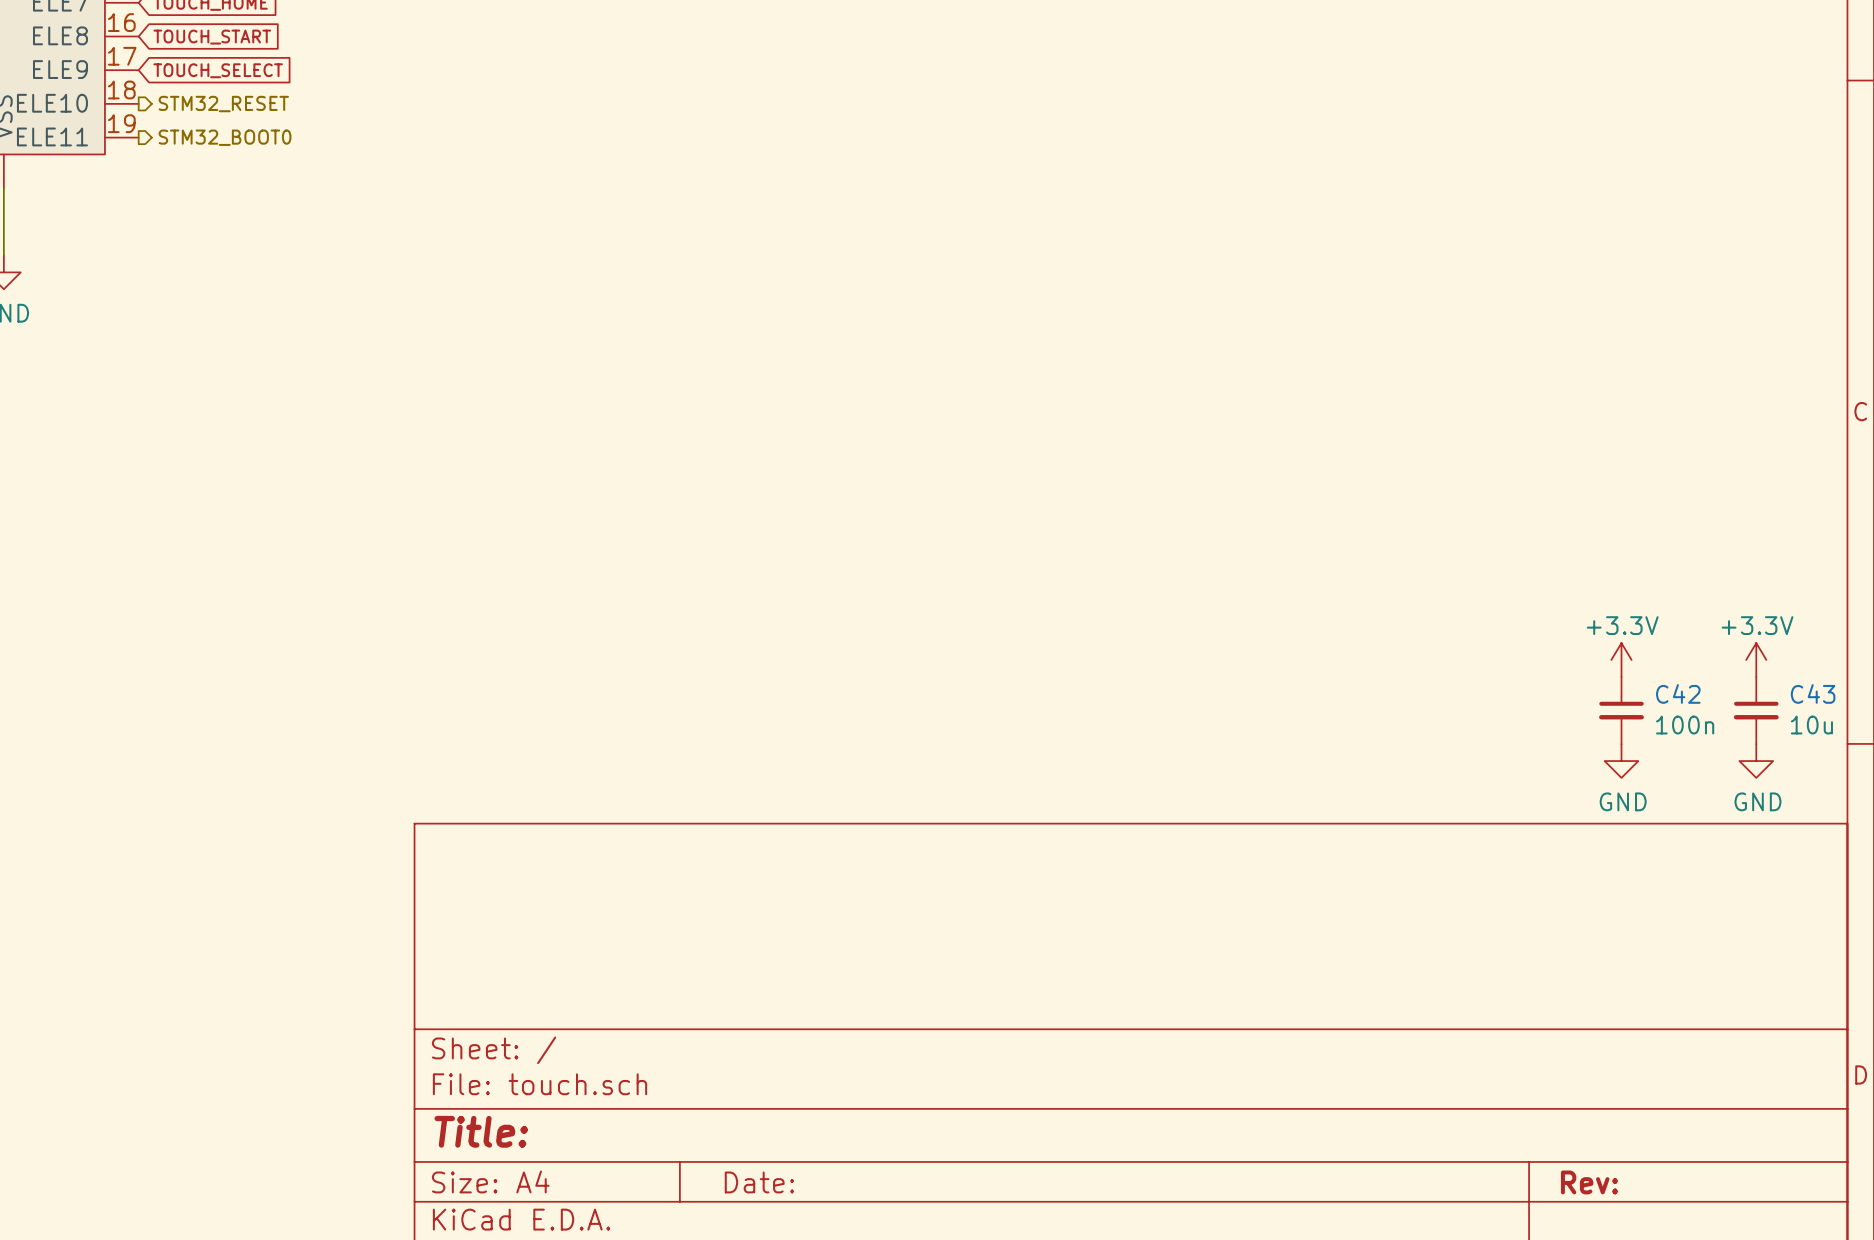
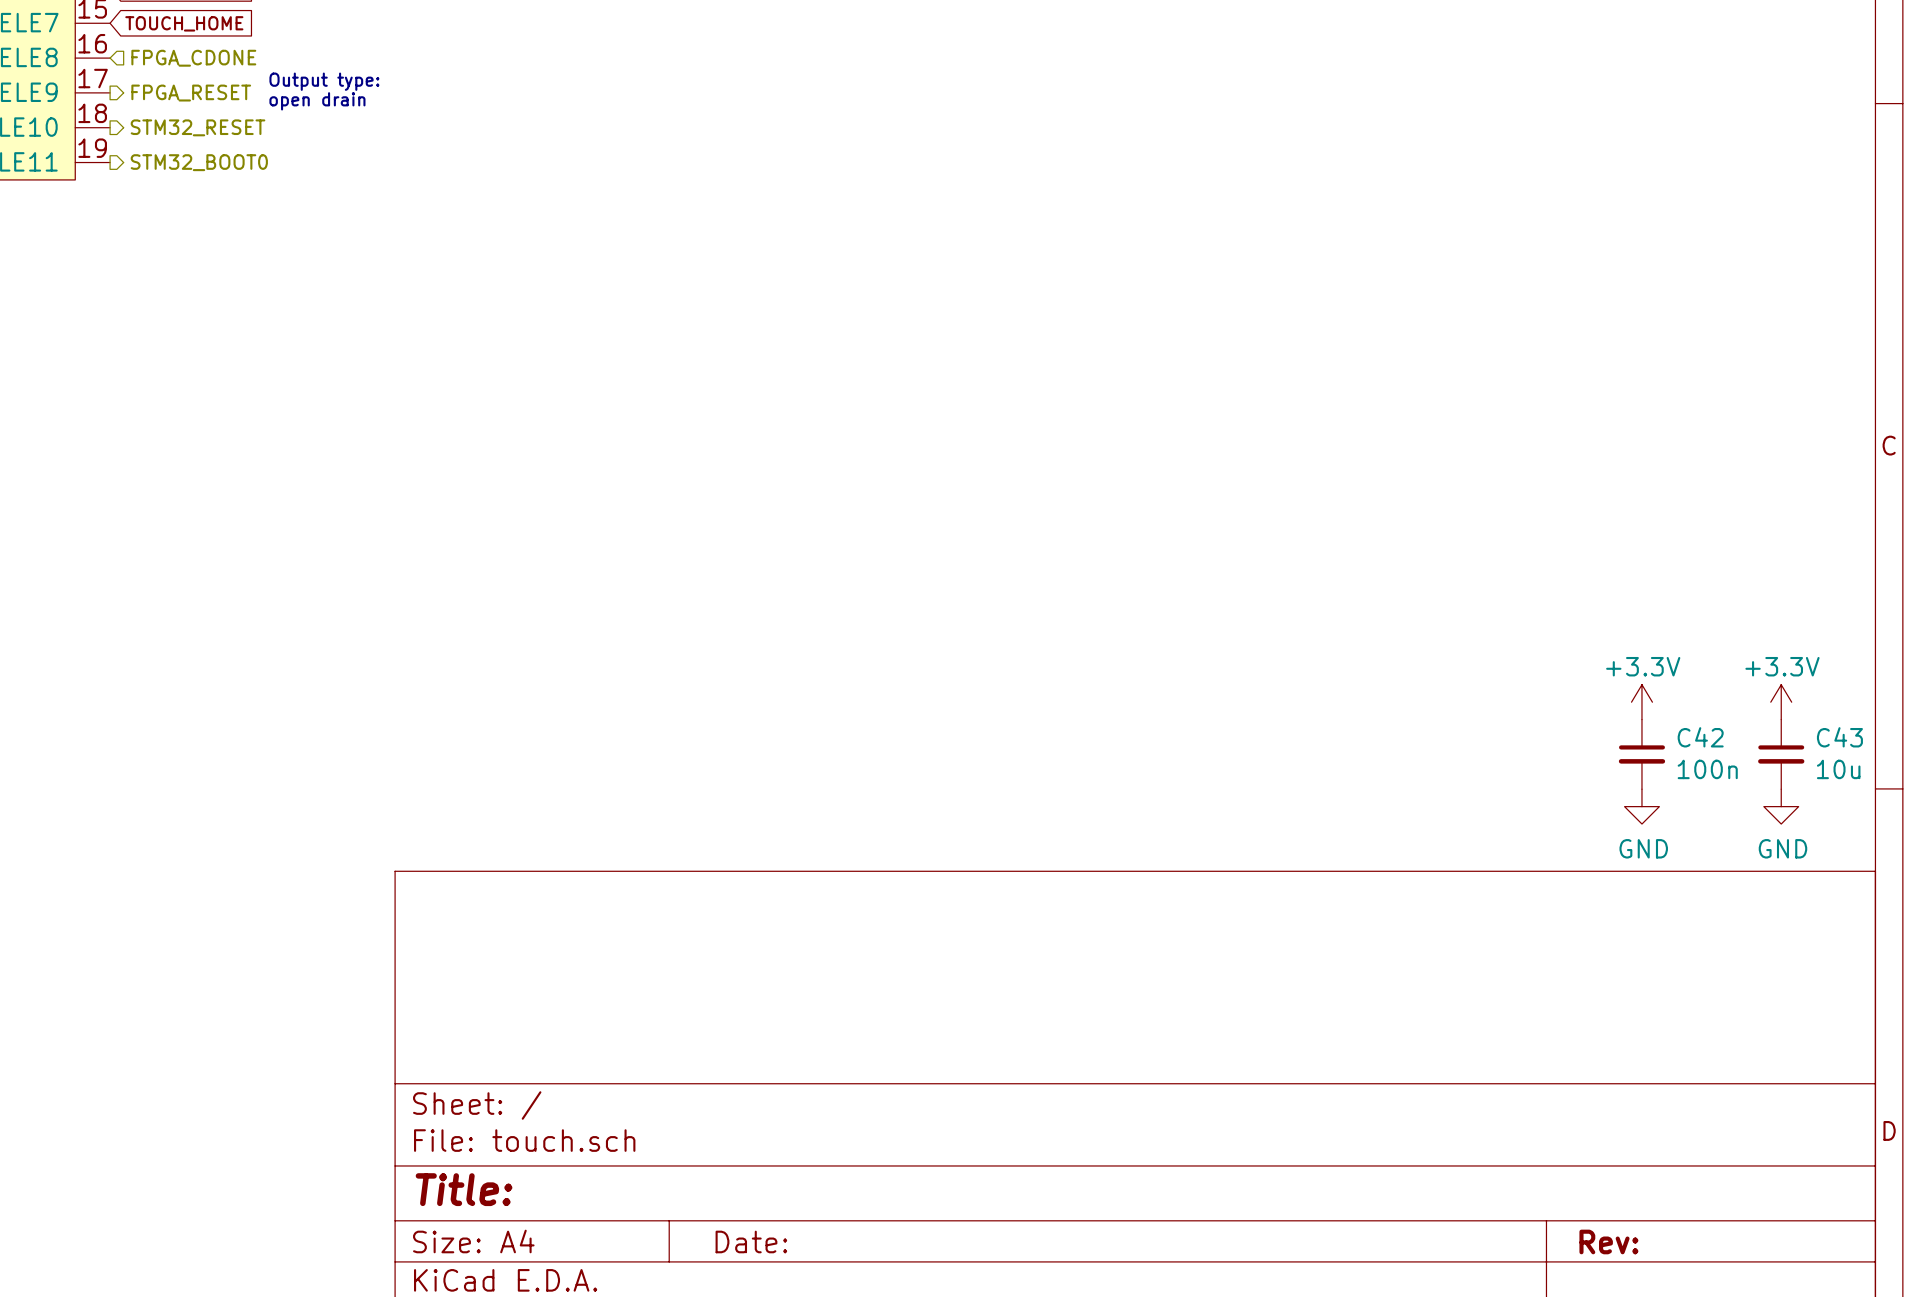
hierarchical label: none -> FPGA_CDONE (193, 58)
global label: TOUCH_START (212, 37) -> none
text: none -> Output type: (324, 81)
hierarchical label: none -> FPGA_RESET (191, 93)
global label: TOUCH_SELECT (218, 70) -> none
text: none -> open drain (317, 101)

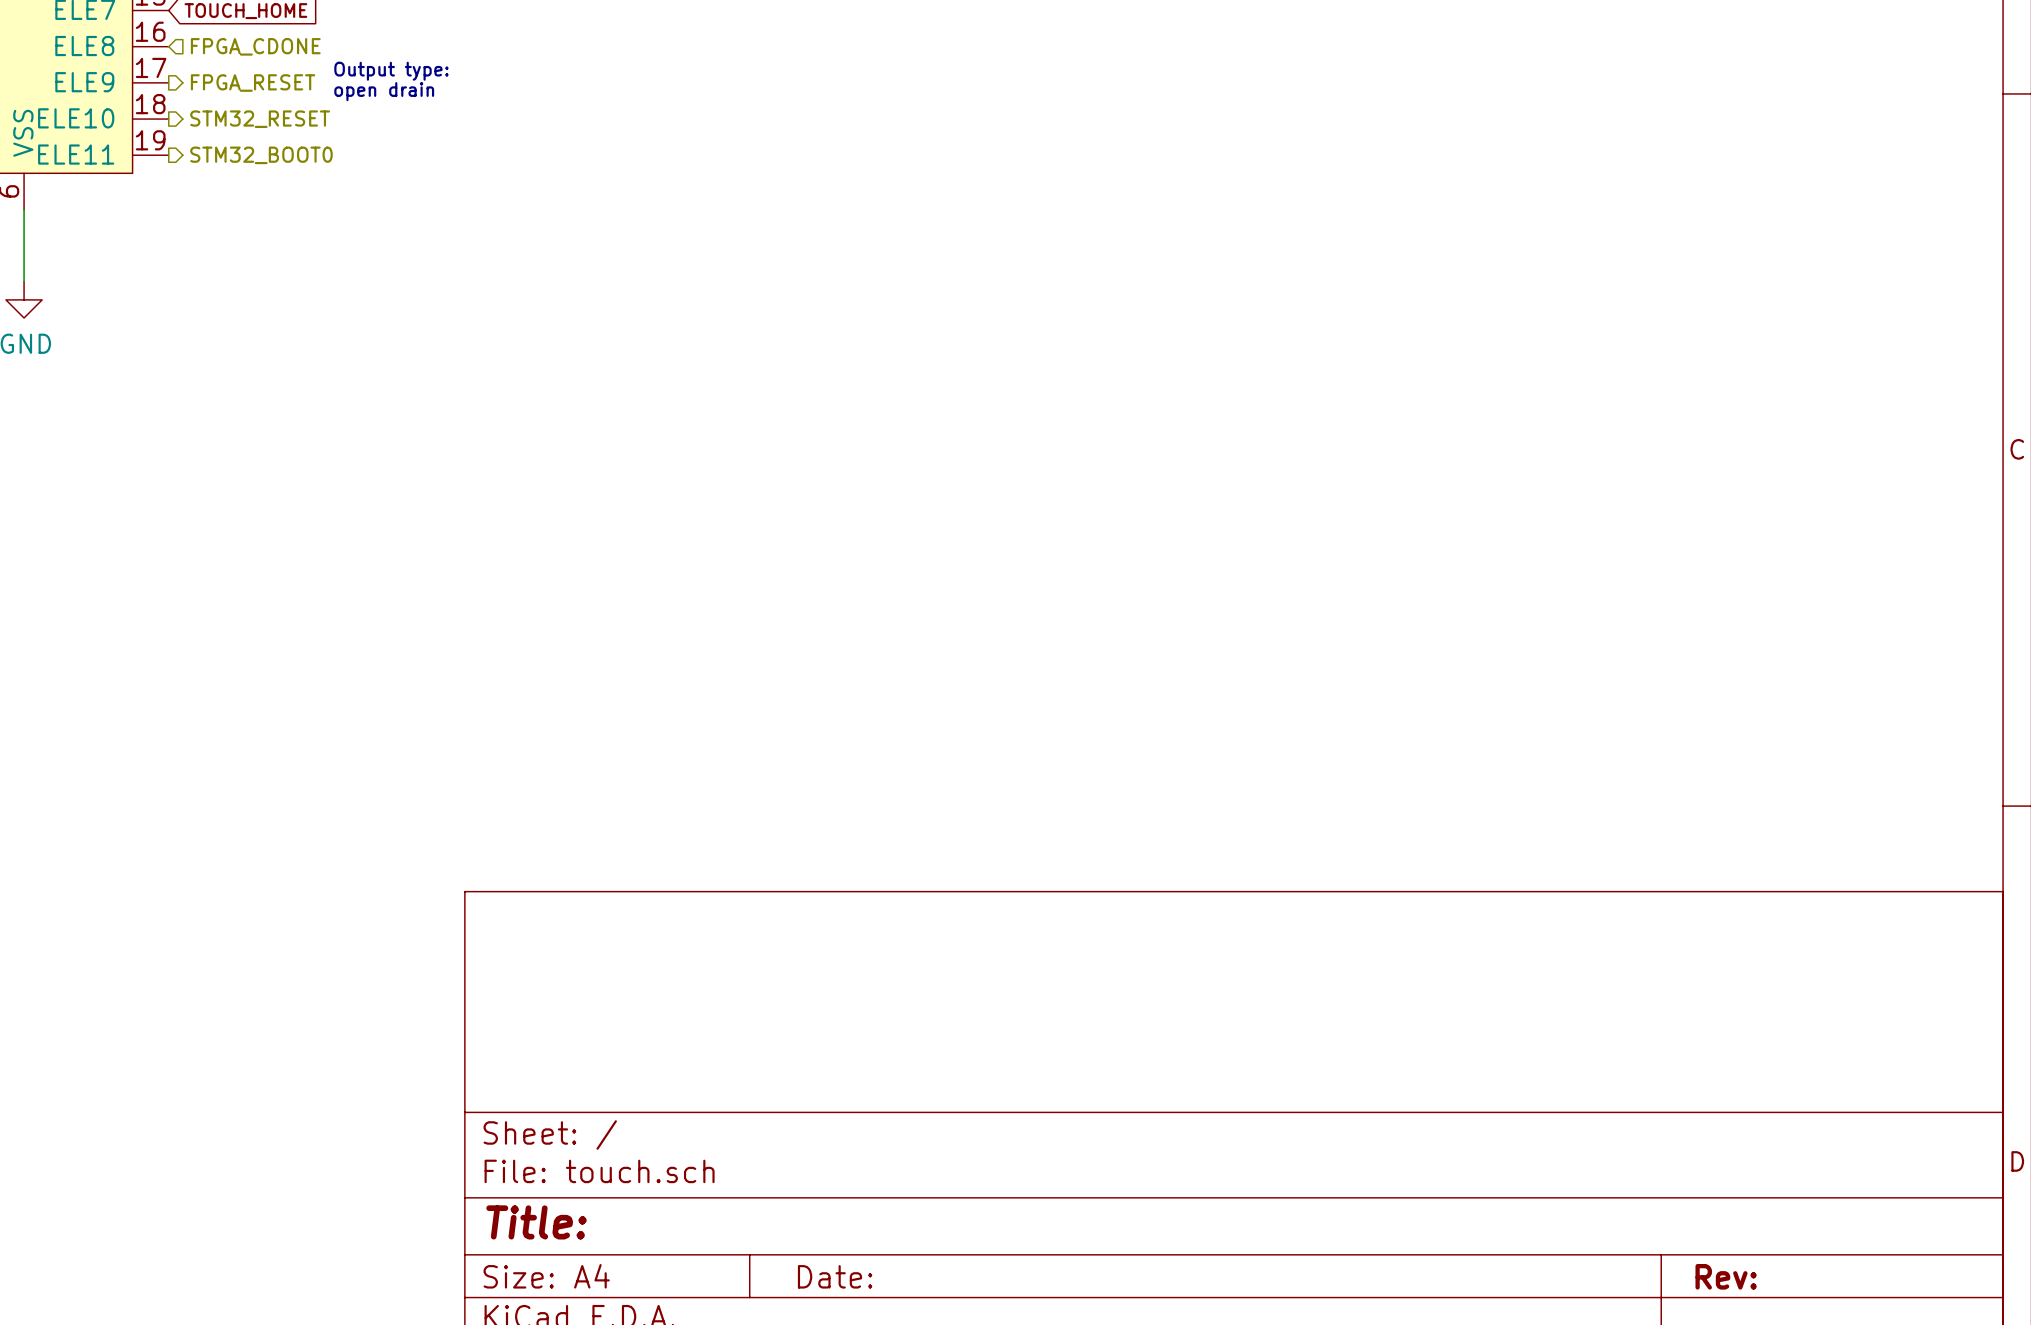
power symbol: +3.3V (1641, 702) -> none
power symbol: +3.3V (1781, 702) -> none
C42: 100n (1641, 754) -> none
C43: 10u (1781, 754) -> none
power symbol: GND (1641, 806) -> none
power symbol: GND (1781, 806) -> none

